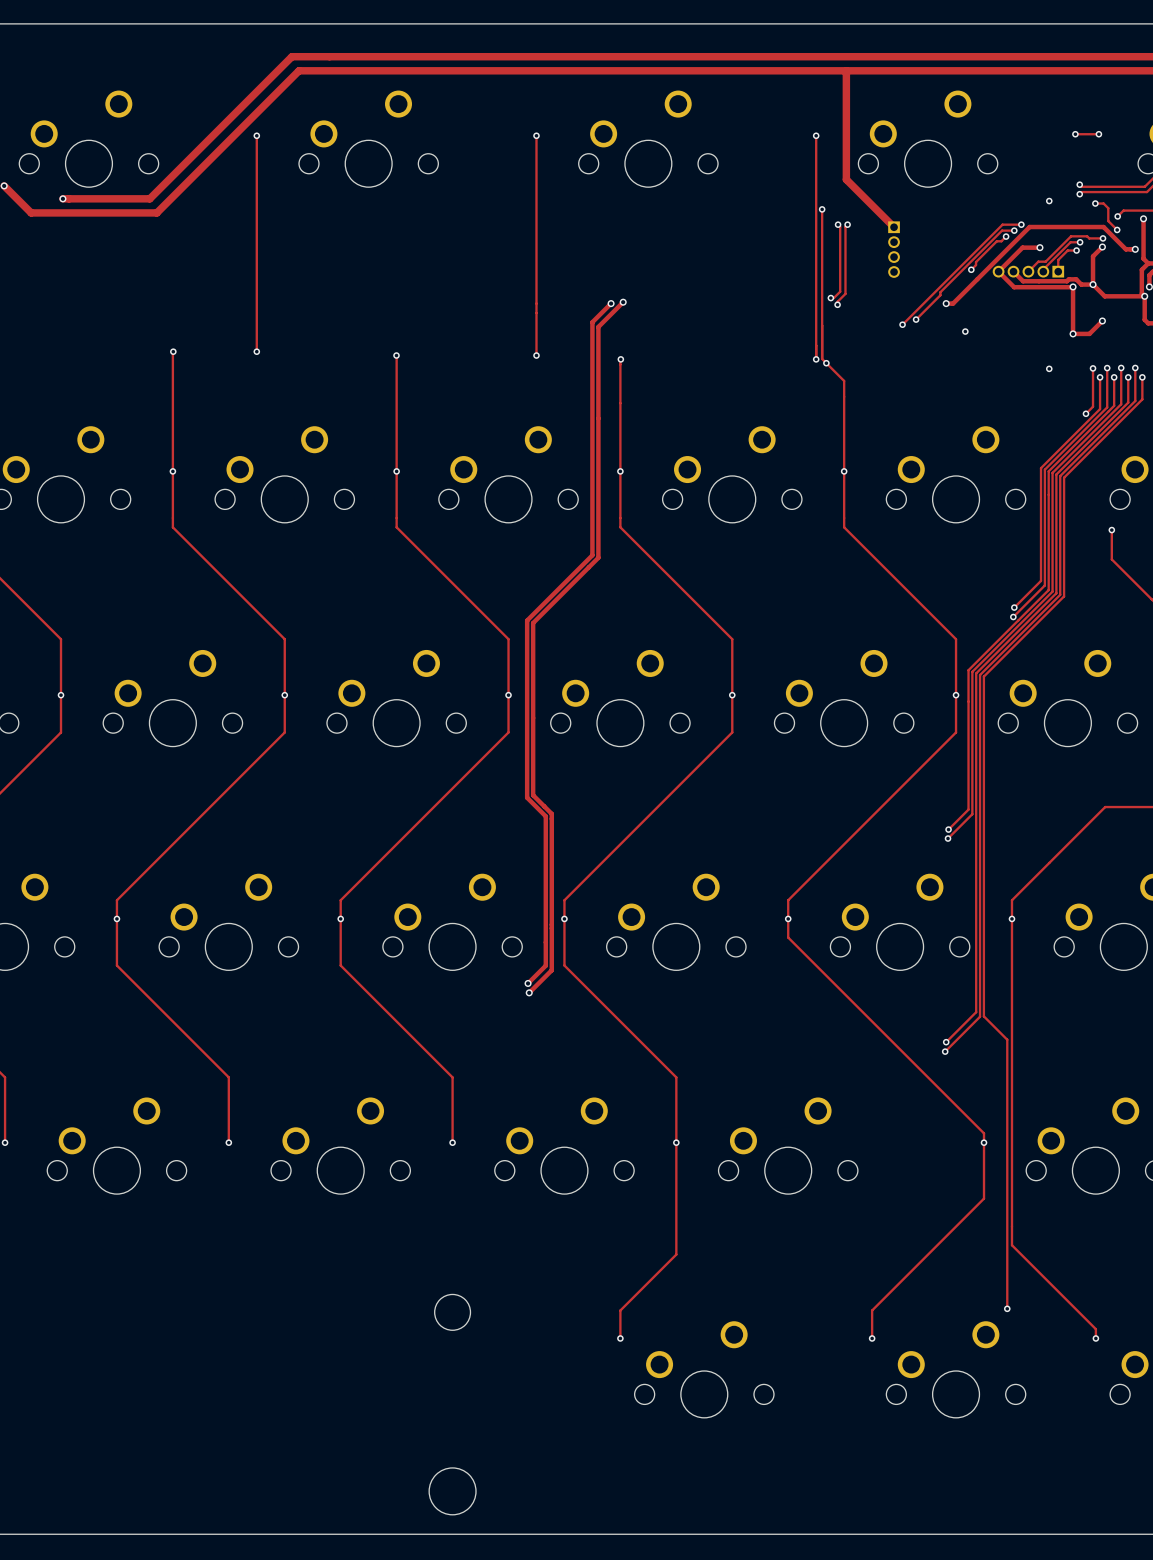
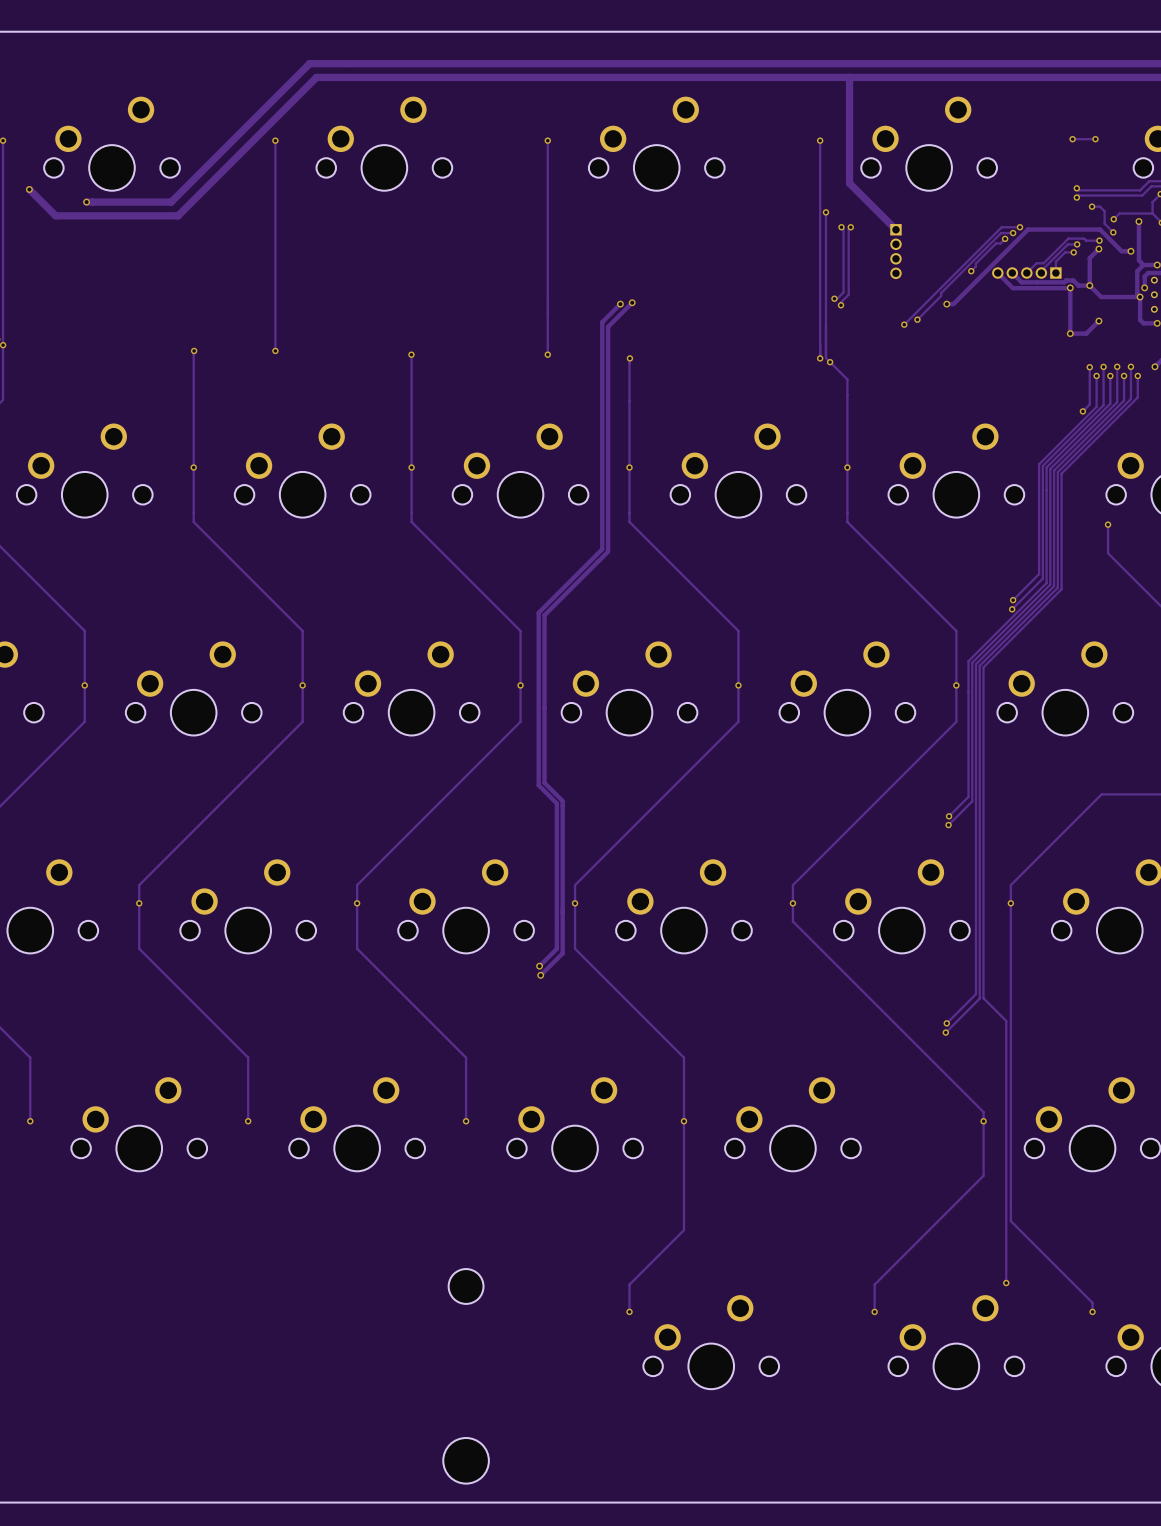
via: (1049, 201) -> none
track: (1039, 247) (1022, 247) (998, 271) -> none
via: (1039, 247) -> none
via: (965, 331) -> none
via: (1049, 368) -> none

